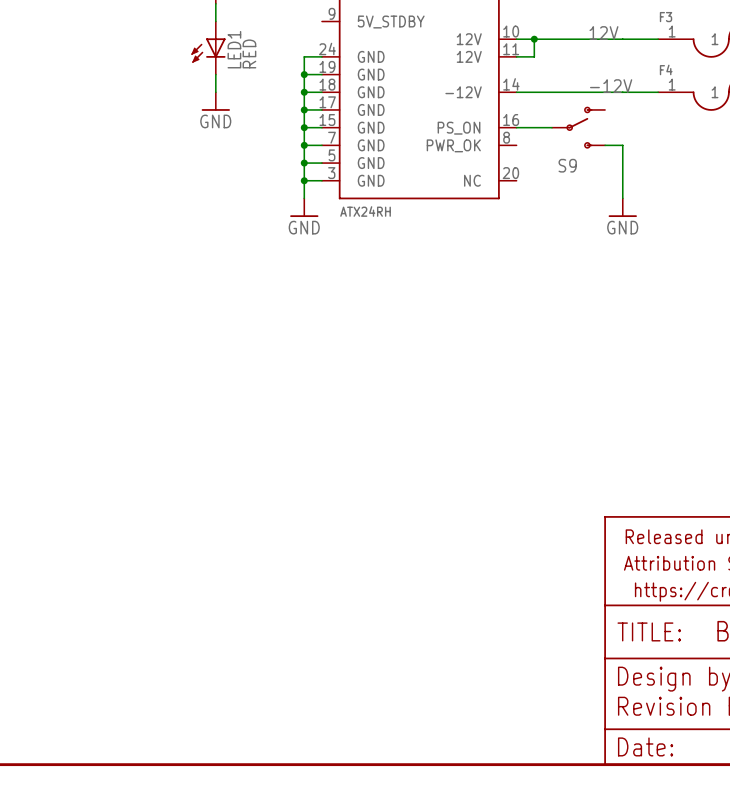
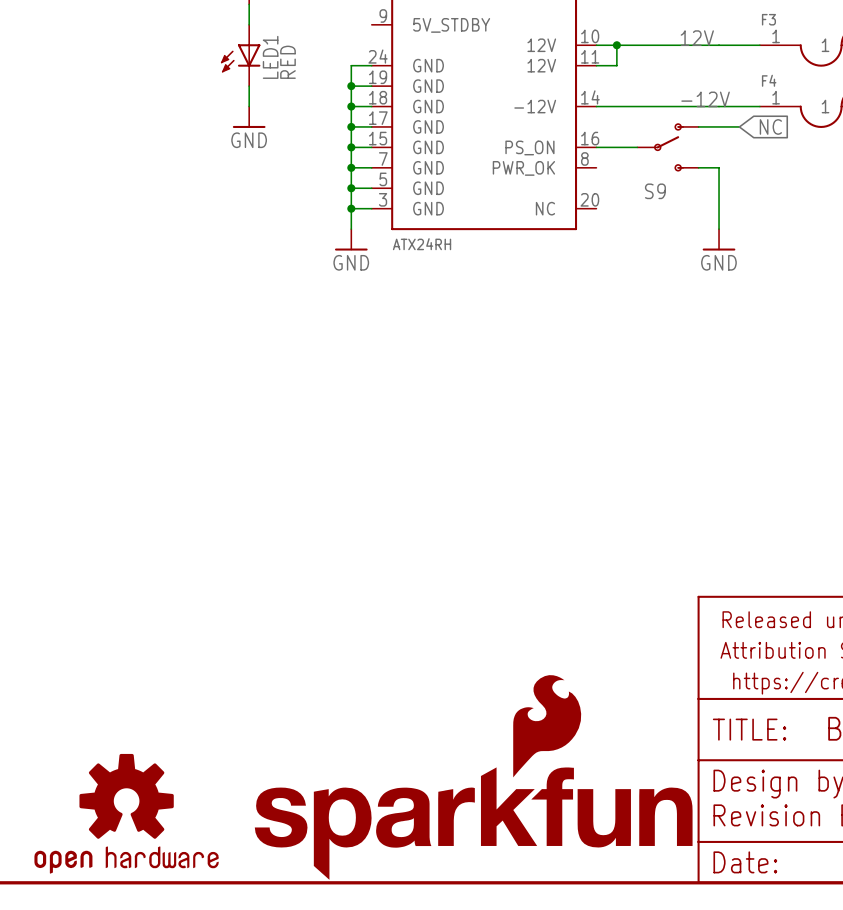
wire: none -> (698, 126) (739, 126)
global label: none -> NC (770, 126)
part: none -> (473, 777)
part: none -> (126, 813)

